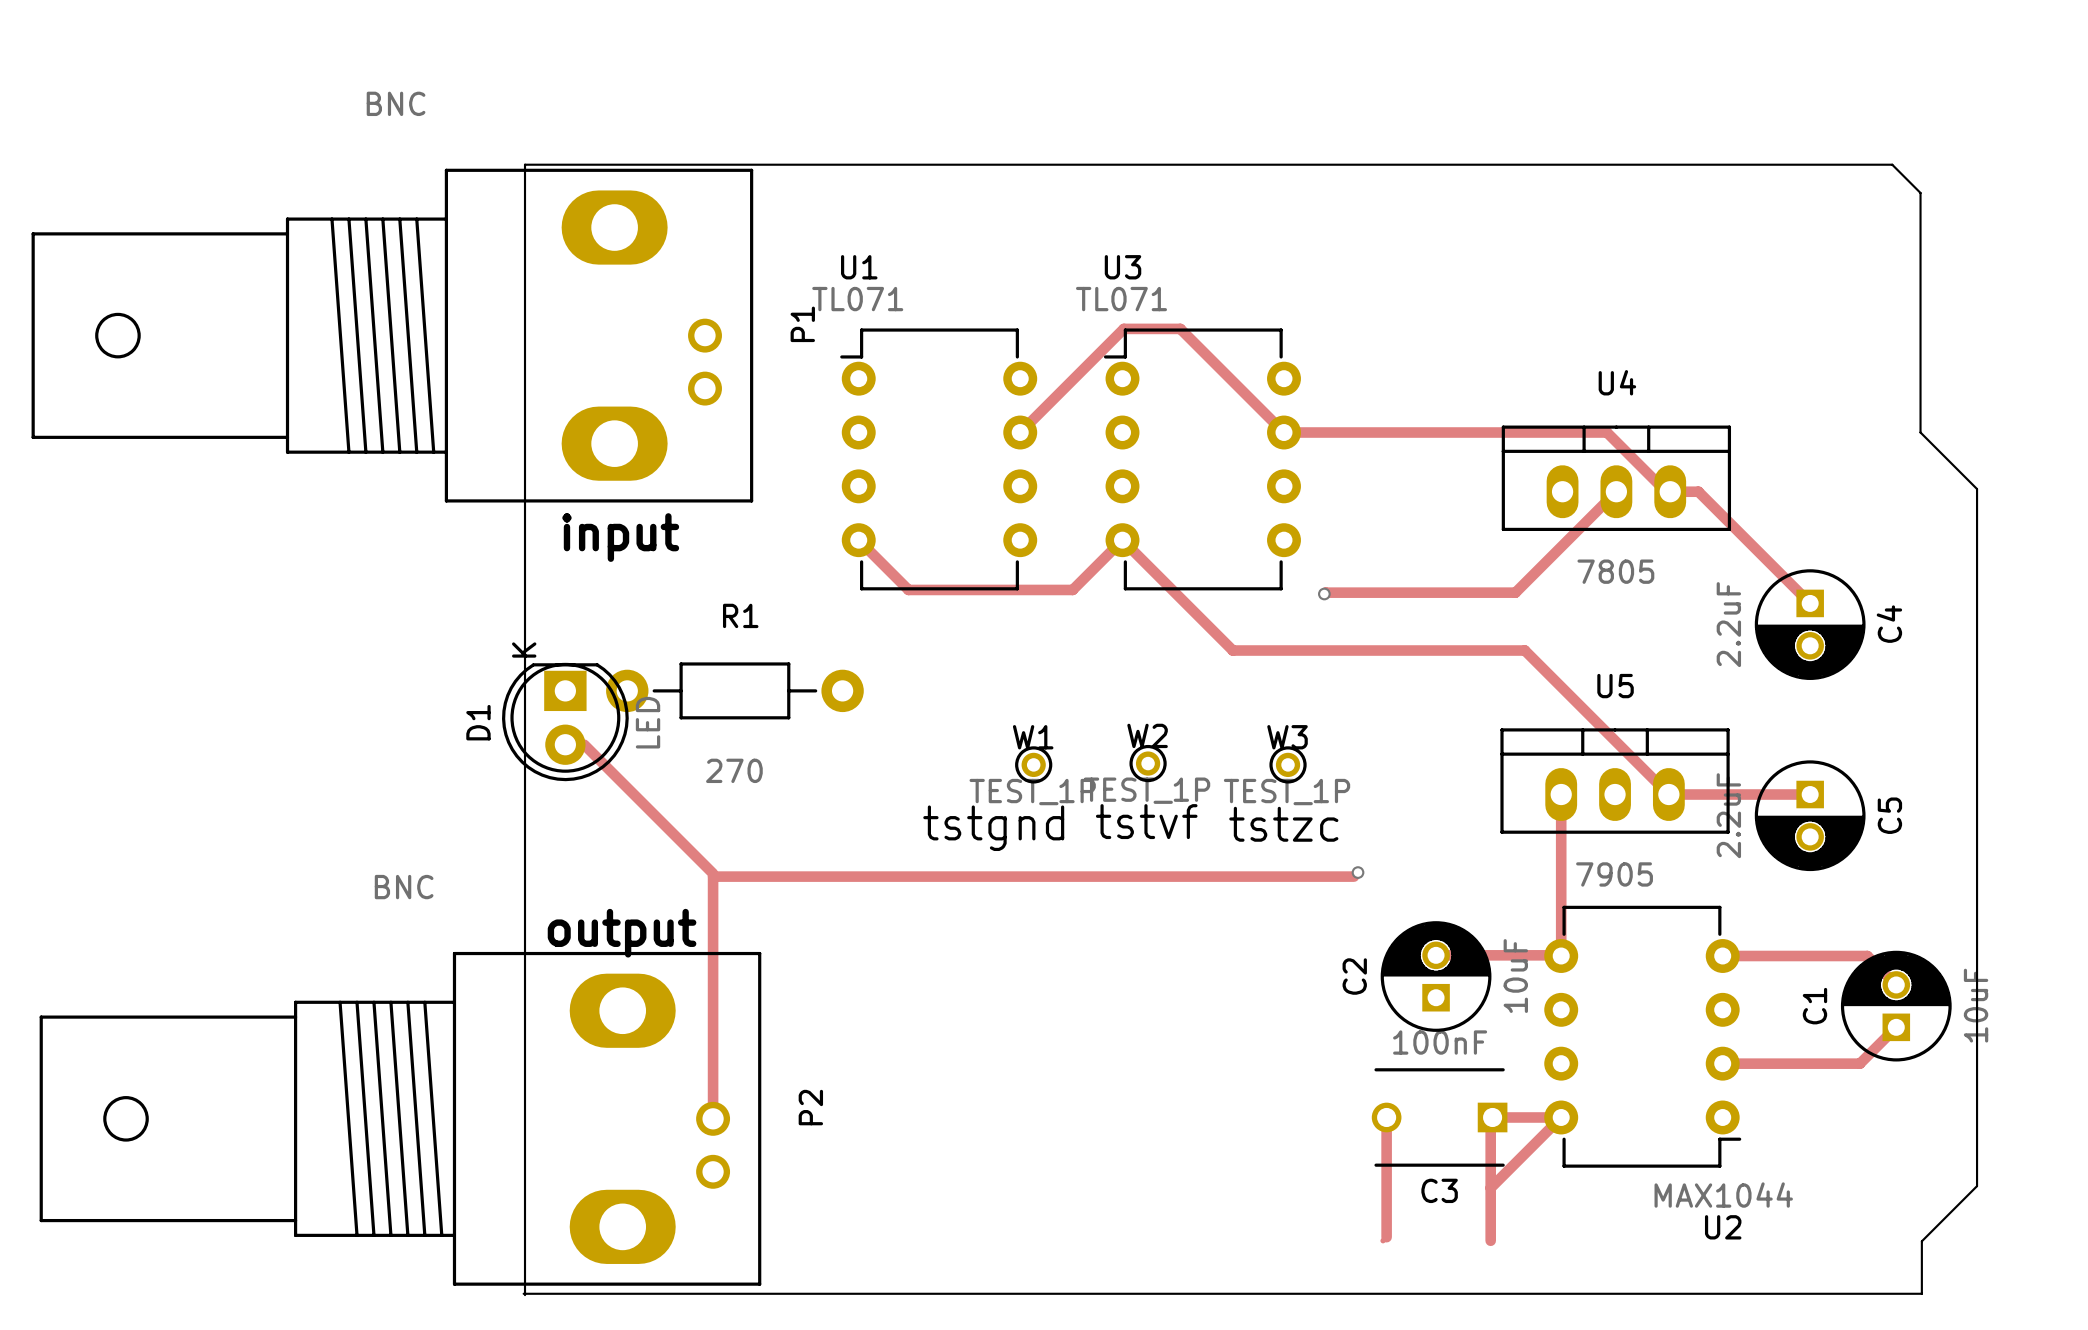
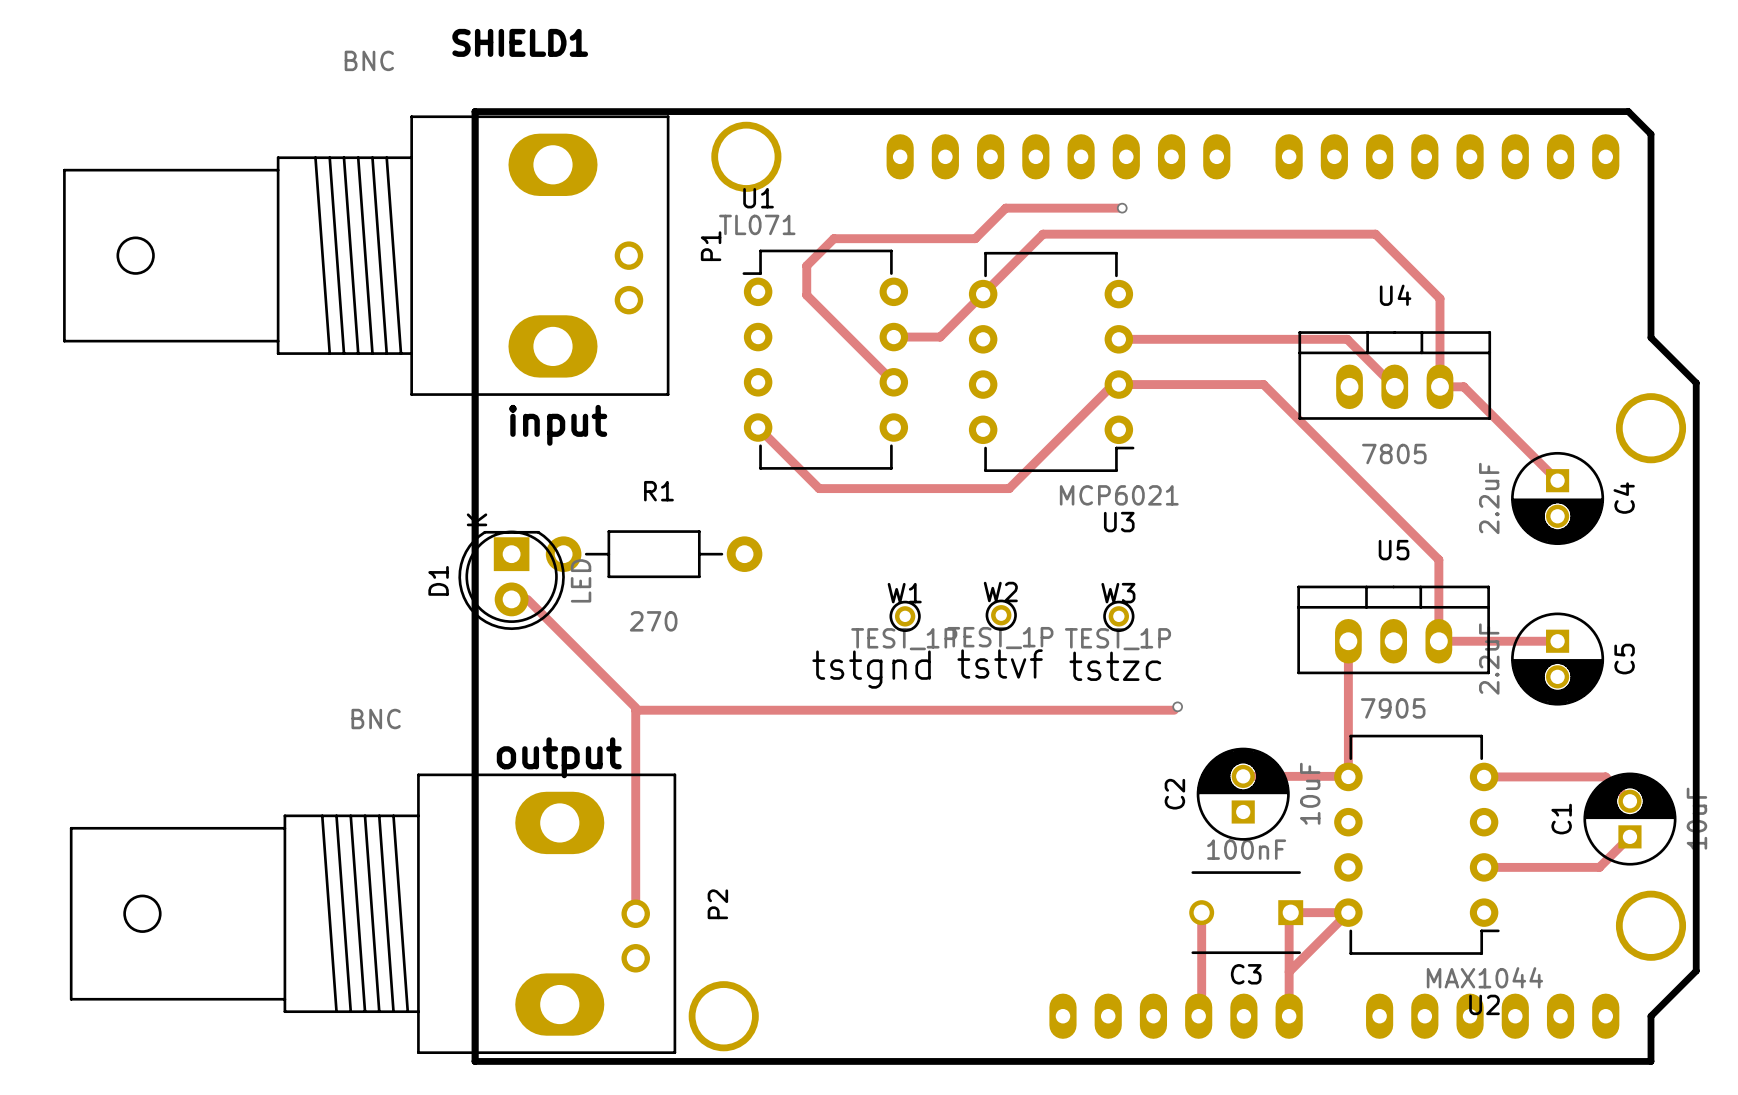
track: none -> (1122, 208) (1005, 208) (975, 238) (833, 238) (806, 265) (806, 295) (893, 382)
via: none -> (1122, 208)
U3 value: TL071 (1121, 299) -> MCP6021 (1119, 495)
track: (1020, 432) (1123, 328) (1180, 328) (1283, 432) (1606, 432) (1666, 491) (1670, 491) -> (893, 337) (940, 337) (1043, 234) (1375, 234) (1439, 298) (1439, 386)
U3 rotation: 0° (1202, 459) -> 180° (1051, 361)
track: none -> (1113, 384) (1009, 488) (819, 488) (799, 469)
track: (1616, 491) (1515, 592) (1324, 594) -> (1394, 386) (1347, 339) (1118, 339)
track: (908, 589) (1072, 589) (1122, 540) (1232, 650) (1524, 650) (1668, 794) -> (1118, 384) (1263, 384) (1438, 559) (1438, 641)
via: (1324, 594) -> none
SHIELD1: none -> (1085, 586)

